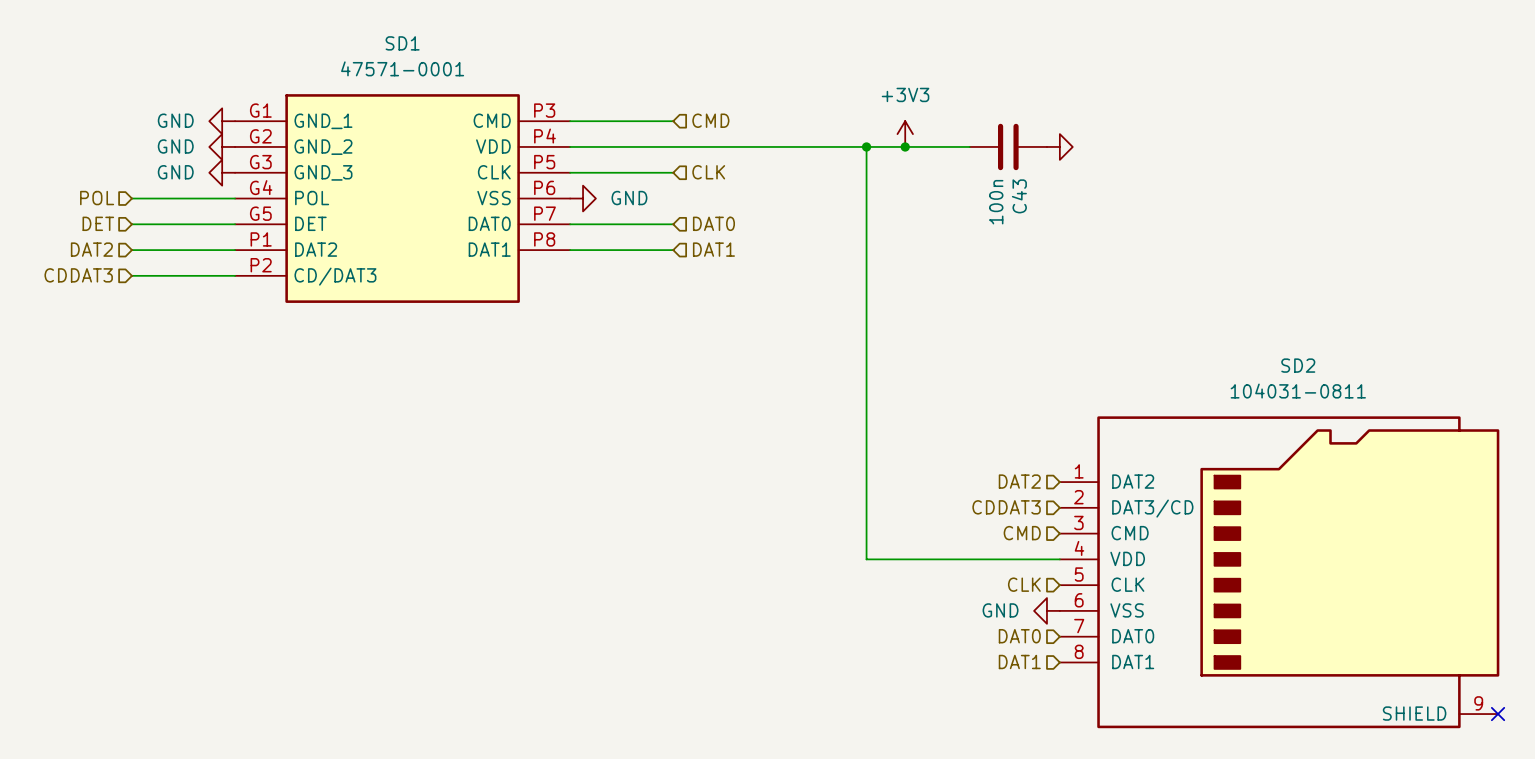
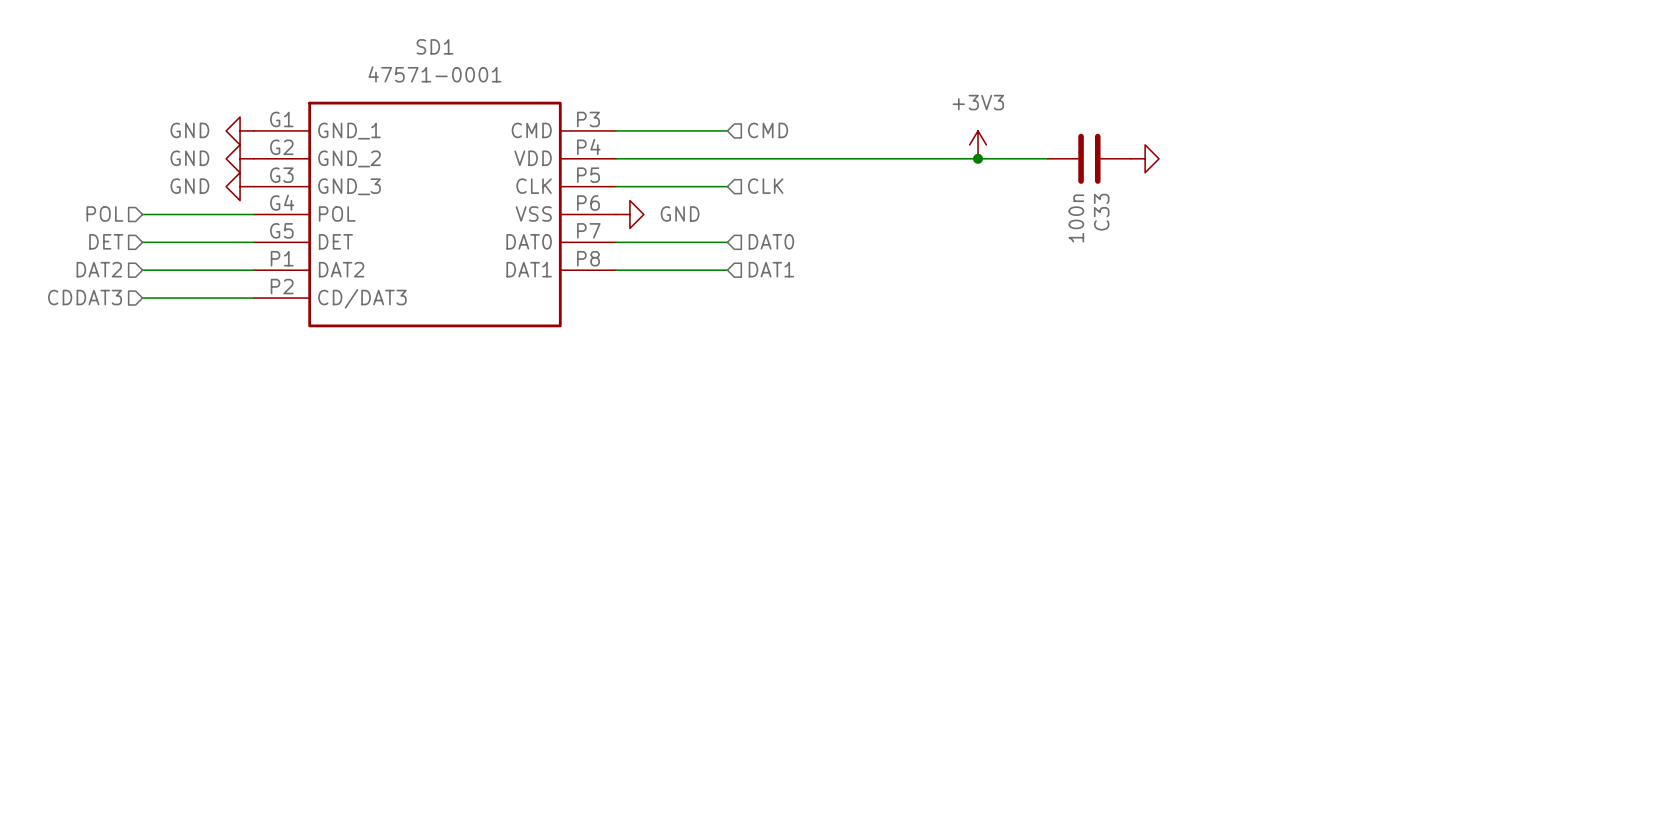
wire: (866, 146) (866, 559) (1059, 559) -> none
junction: (866, 146) -> none
C43 name: C43 (1019, 196) -> C33 (1101, 212)
hierarchical label: DAT2 (1019, 481) -> none
hierarchical label: CDDAT3 (1006, 507) -> none
hierarchical label: CMD (1022, 533) -> none
SD2: 104031-0811 (1279, 572) -> none
hierarchical label: CLK (1024, 584) -> none
power symbol: GND (1046, 610) -> none
hierarchical label: DAT0 (1019, 636) -> none
hierarchical label: DAT1 (1019, 662) -> none
no-connect mark: (1498, 714) -> none

